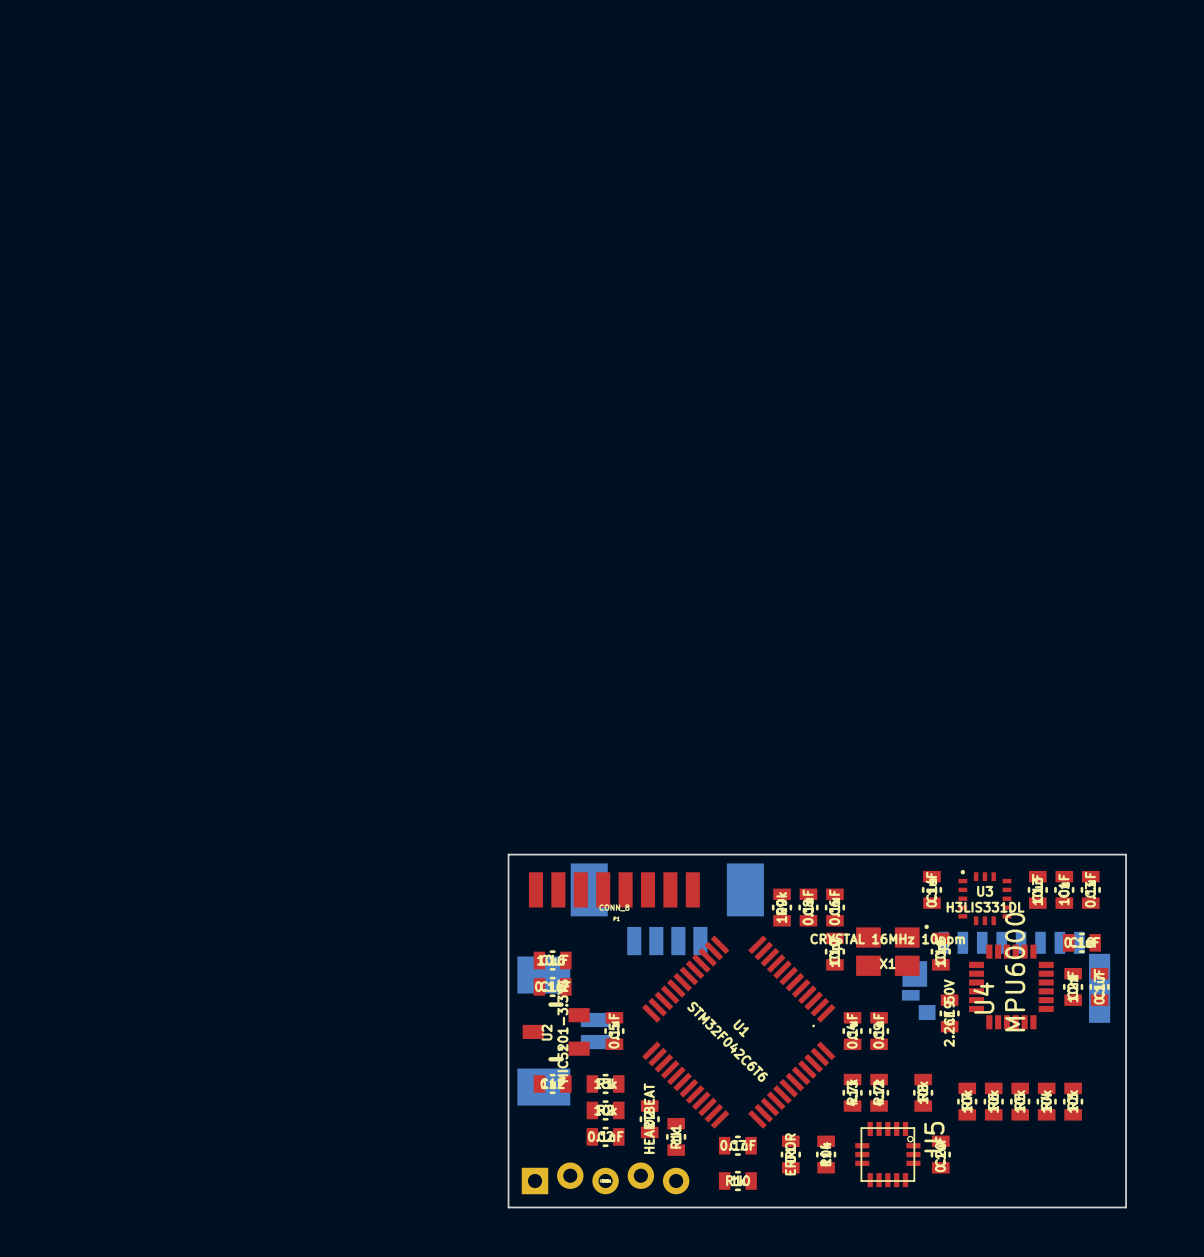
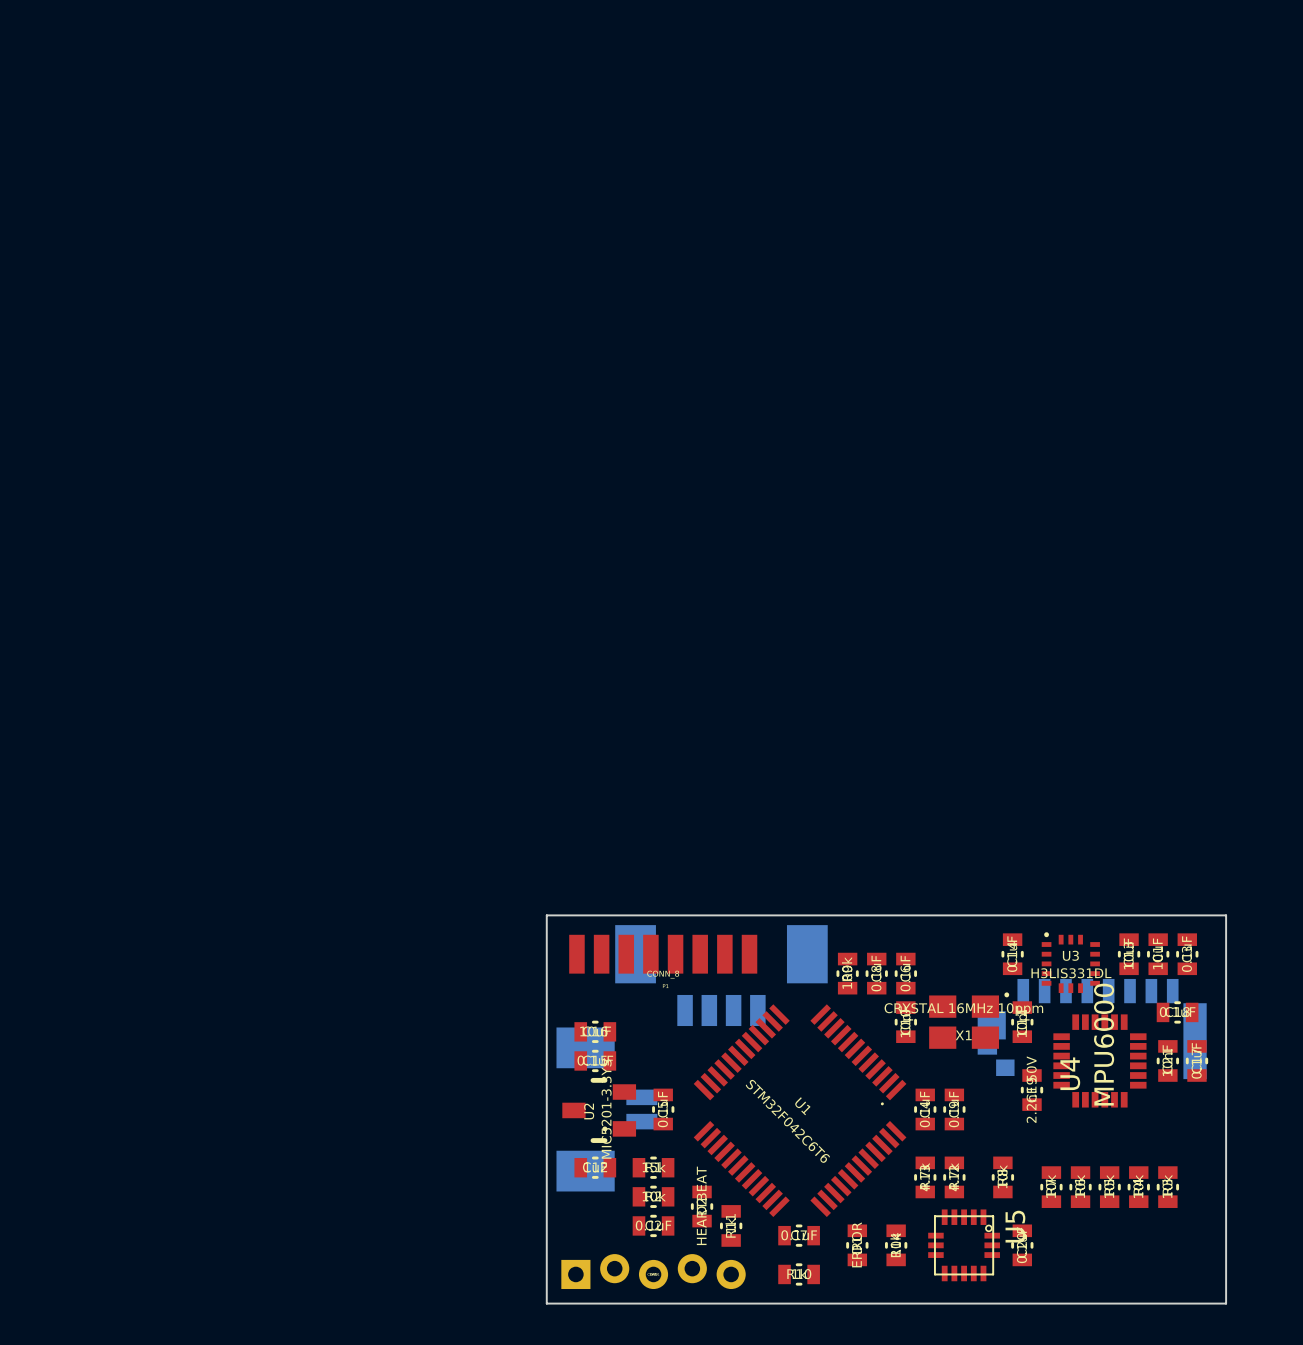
part: none -> (1092, 1029)
part: (1006, 977) -> none

